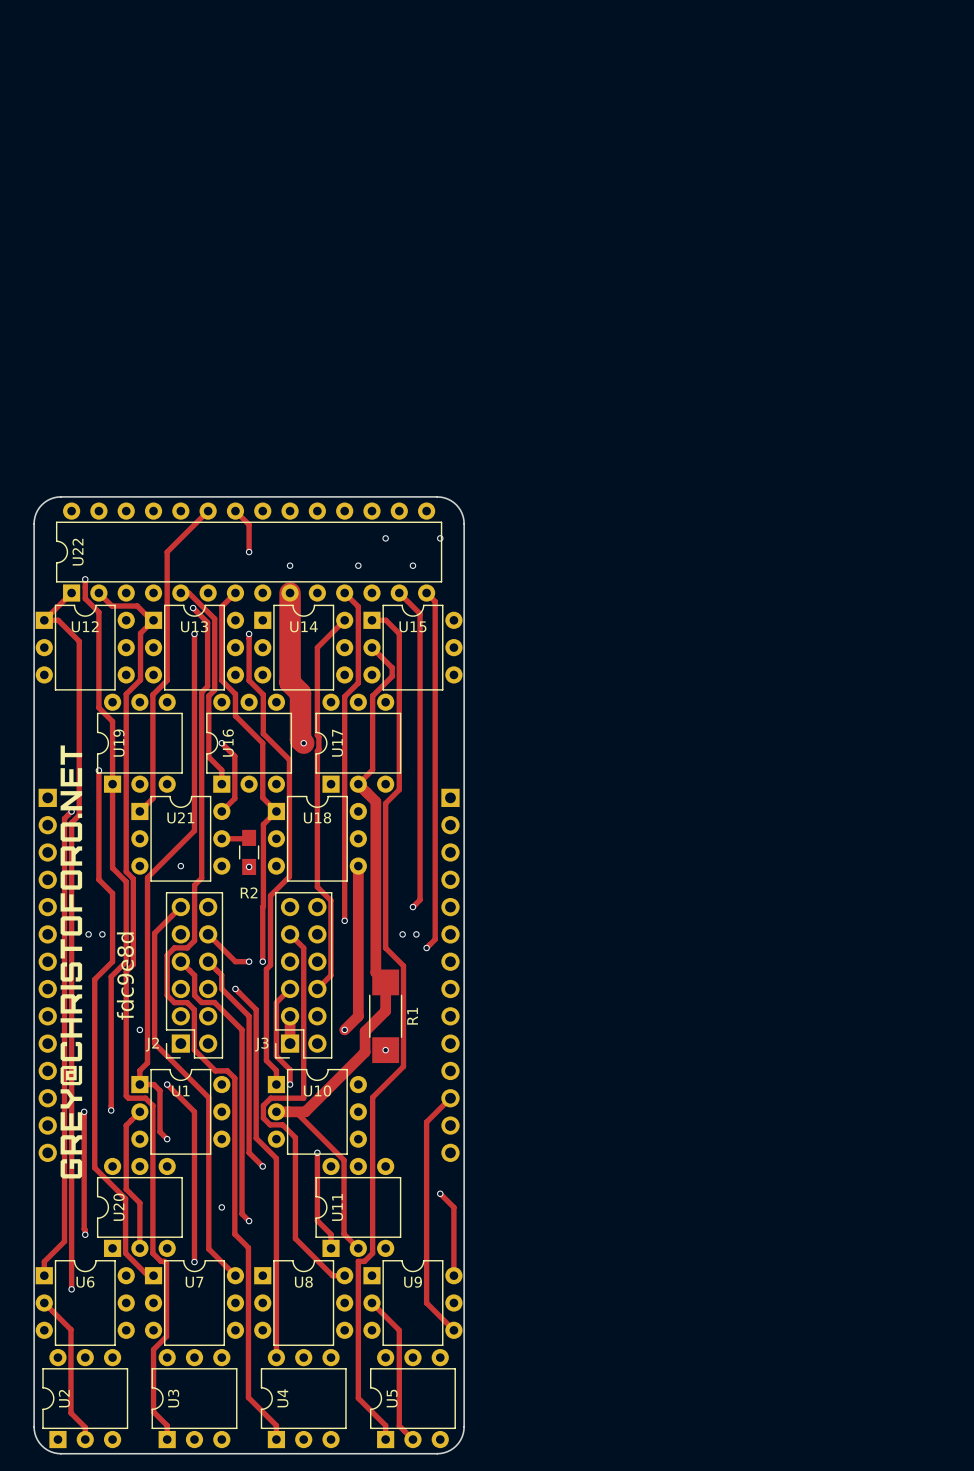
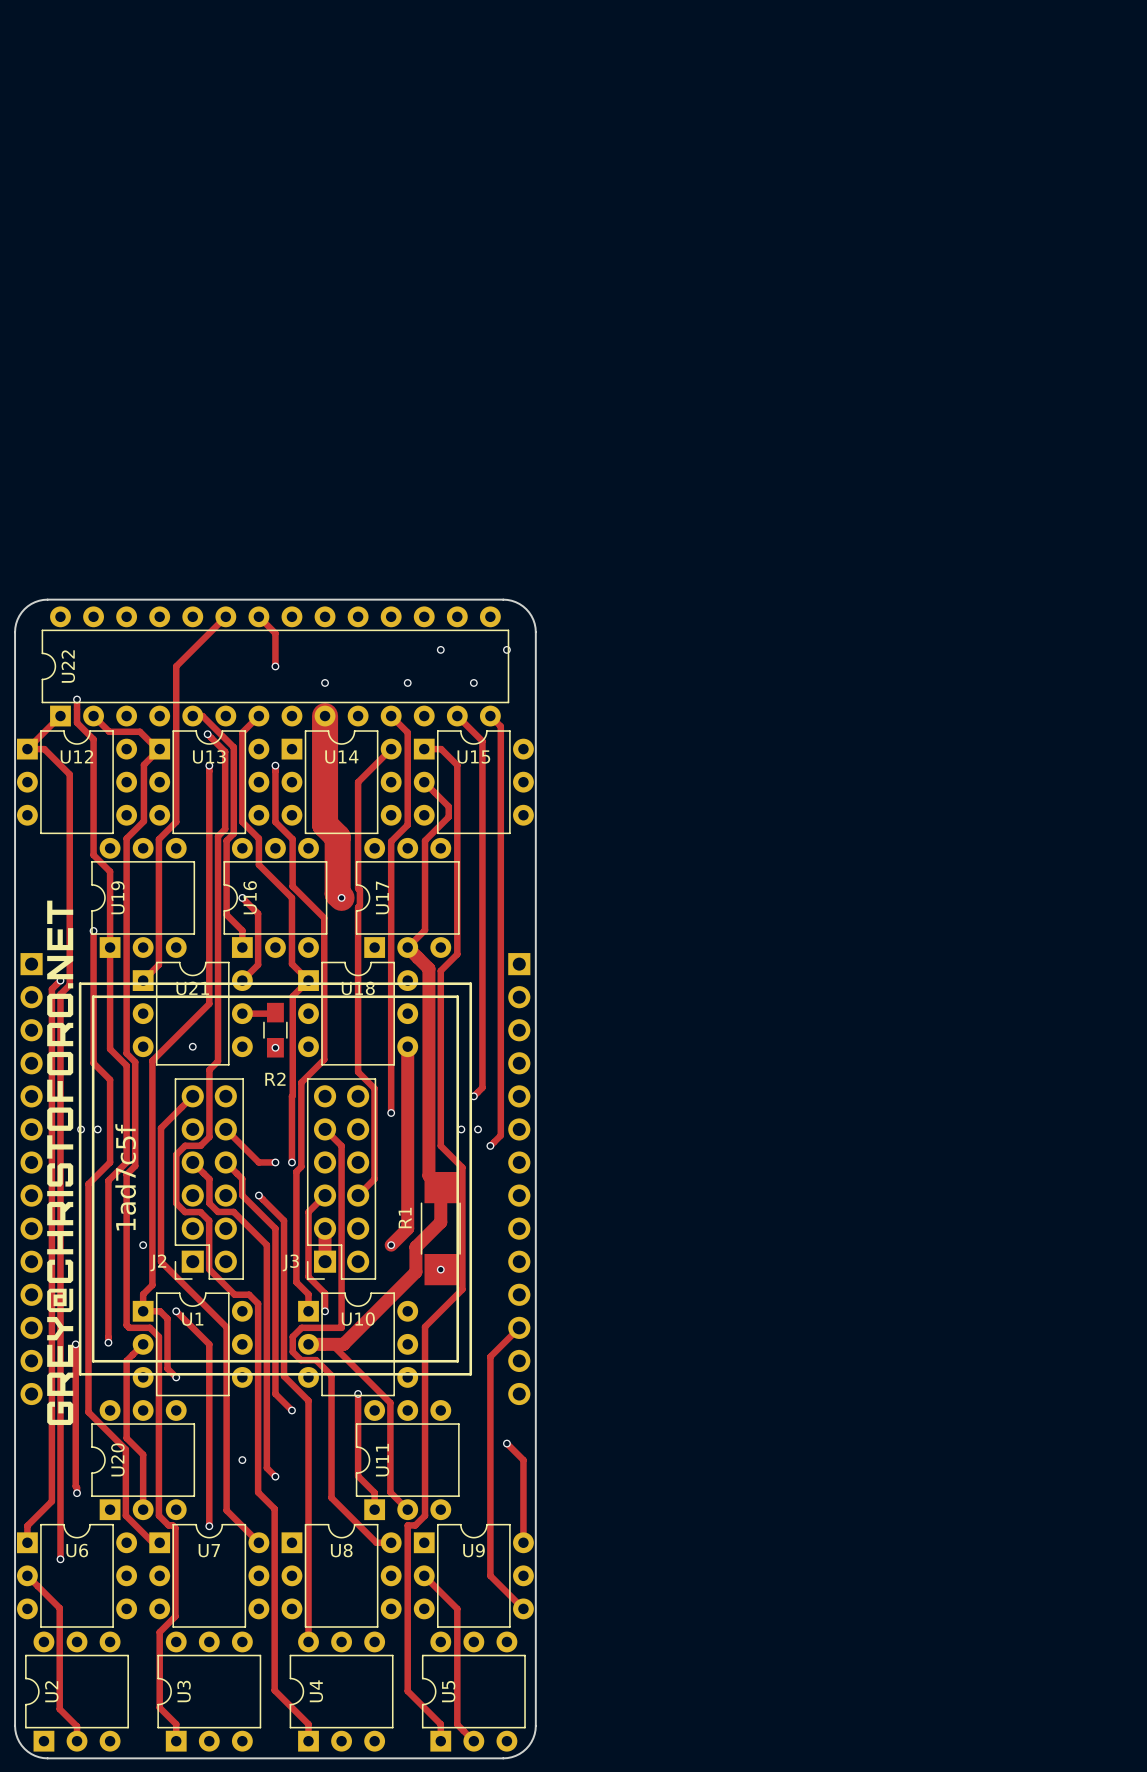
line: none -> (80, 983) (80, 1374) (470, 1374) (470, 983) (80, 983)
line: none -> (93, 996) (93, 1361) (457, 1361) (457, 996) (93, 996)
text: fdc9e8d (125, 976) -> 1ad7c5f (125, 1177)
R1 name position: R1 (412, 1016) -> R1 (405, 1218)

